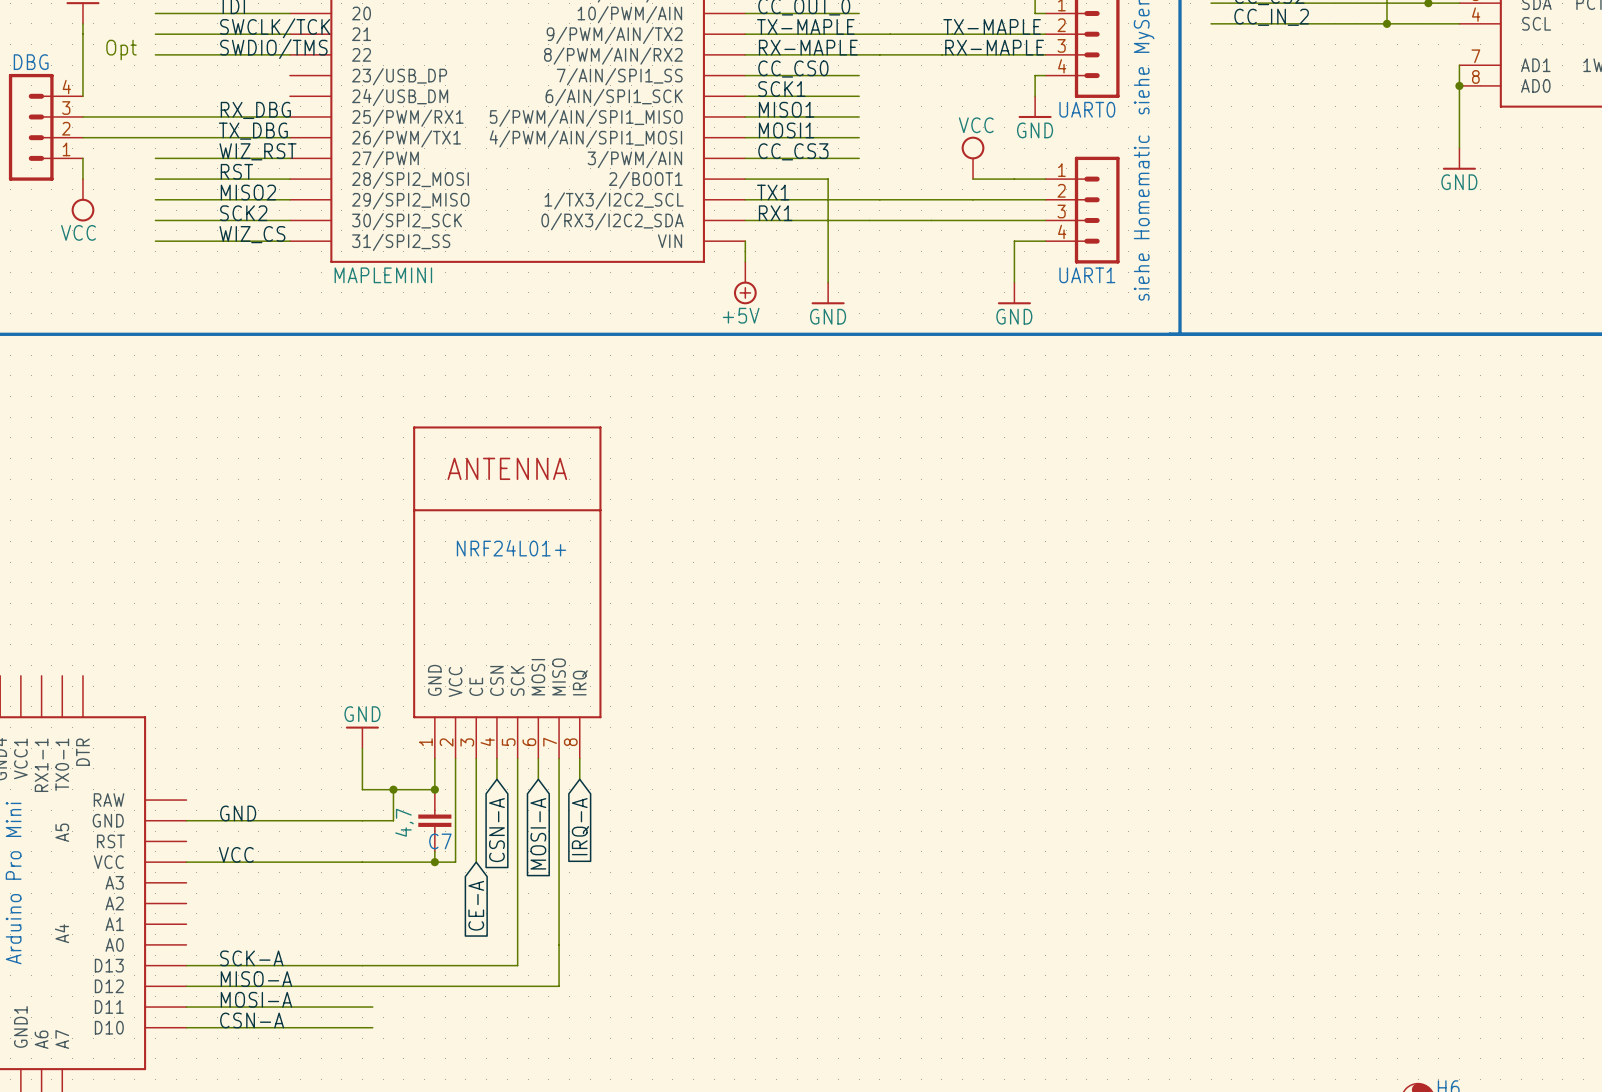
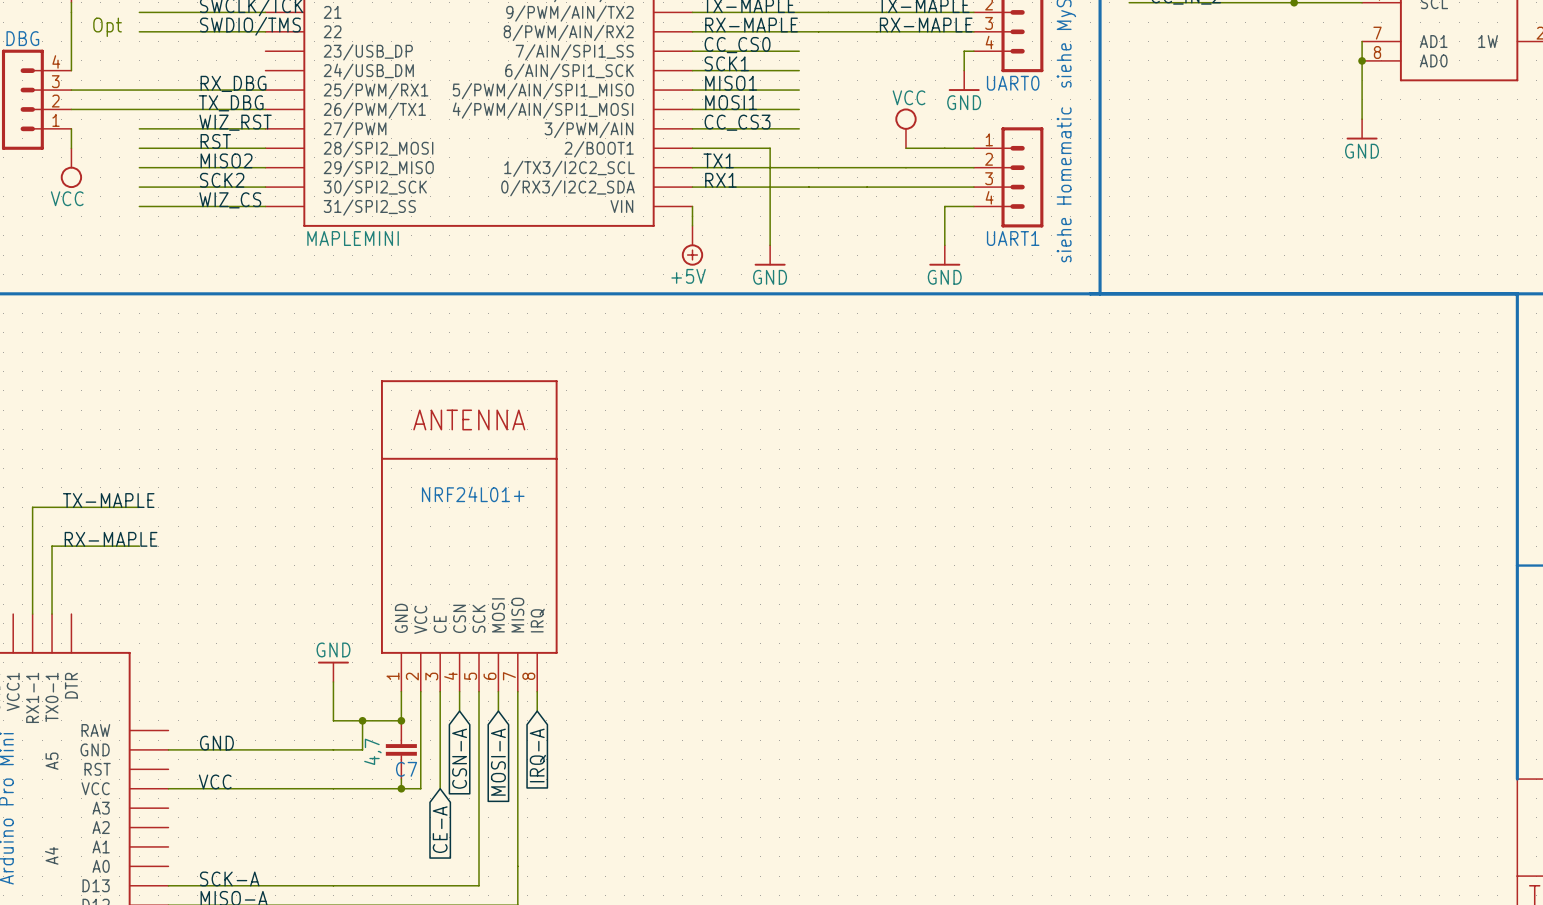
label: none -> TX-MAPLE (108, 500)
wire: none -> (139, 507) (32, 507) (32, 614)
label: none -> RX-MAPLE (111, 539)
wire: none -> (139, 546) (52, 546) (52, 614)

